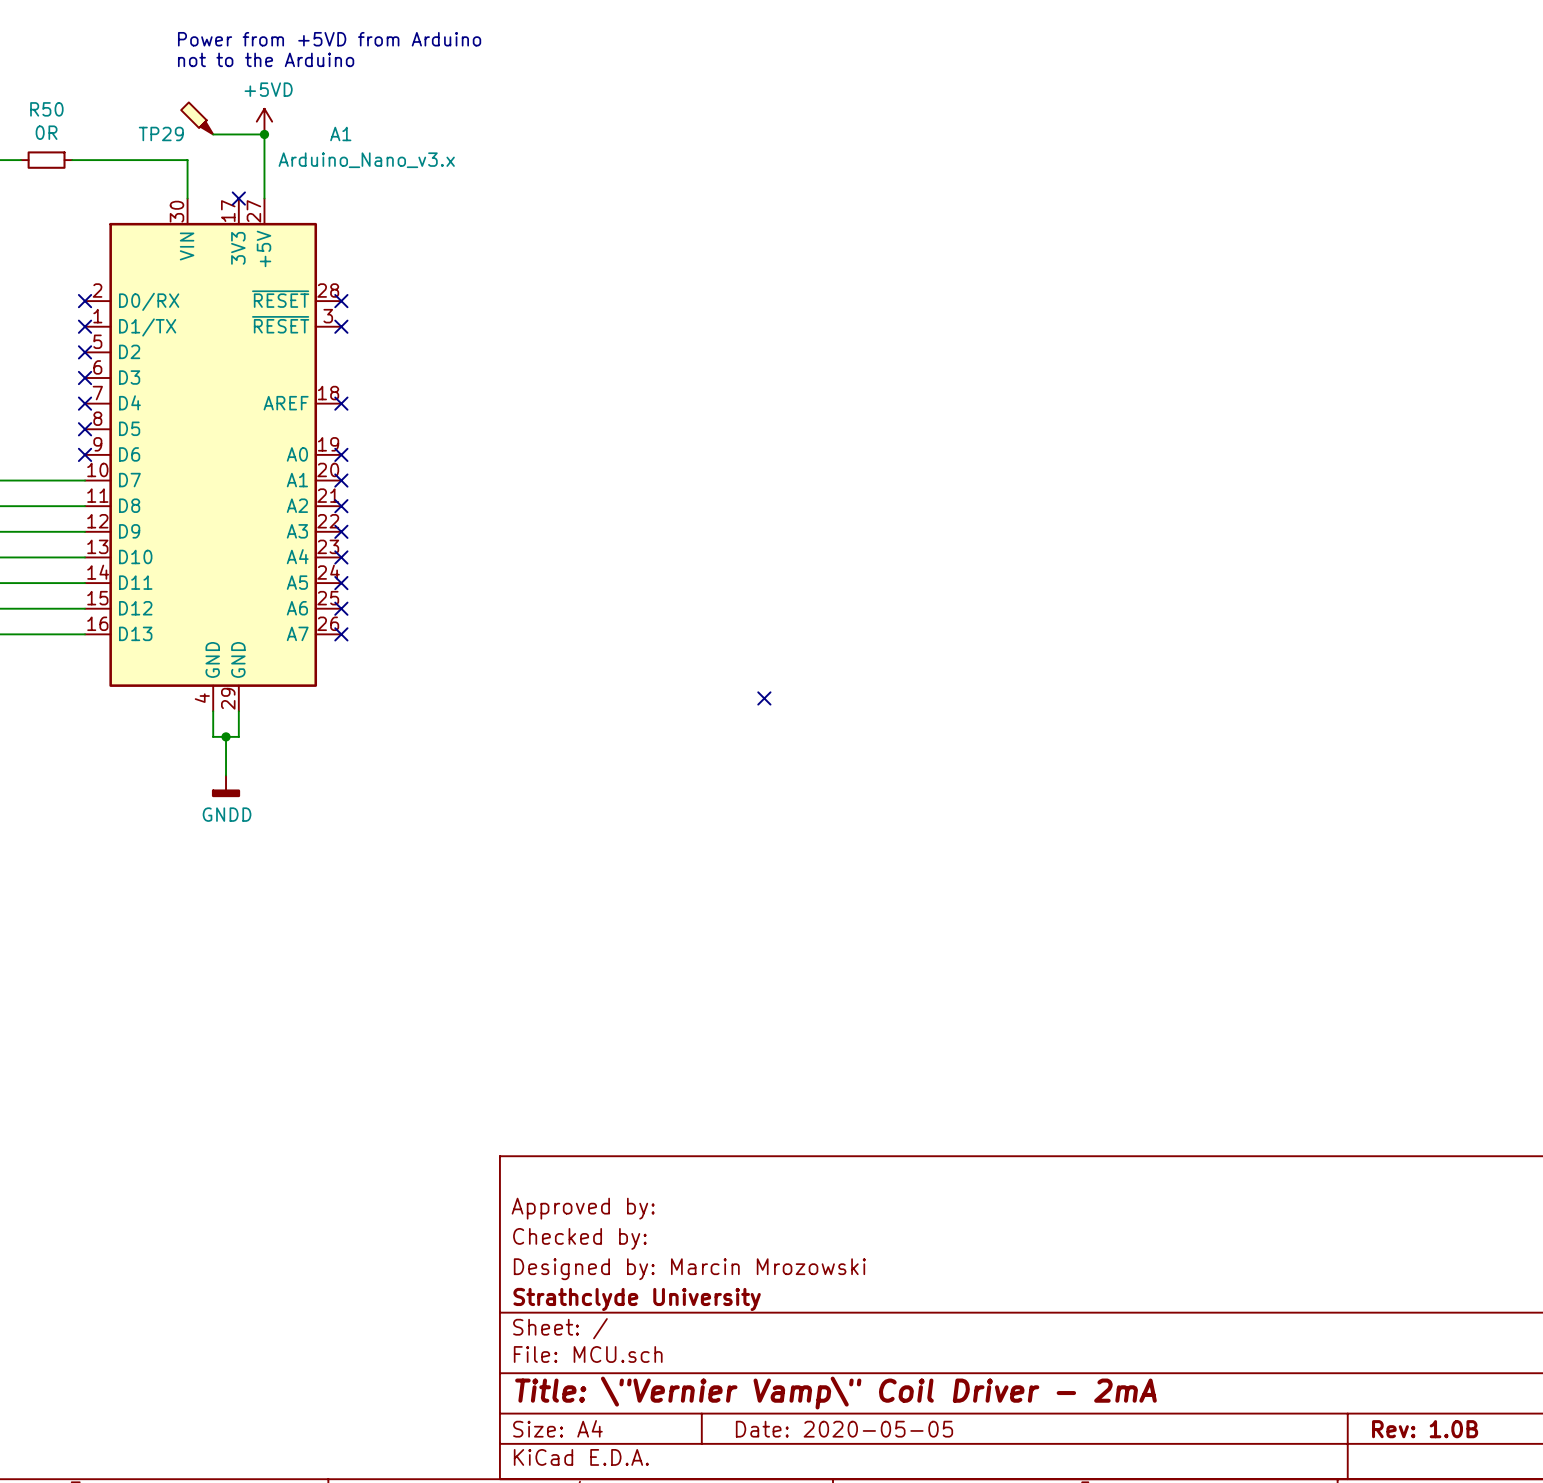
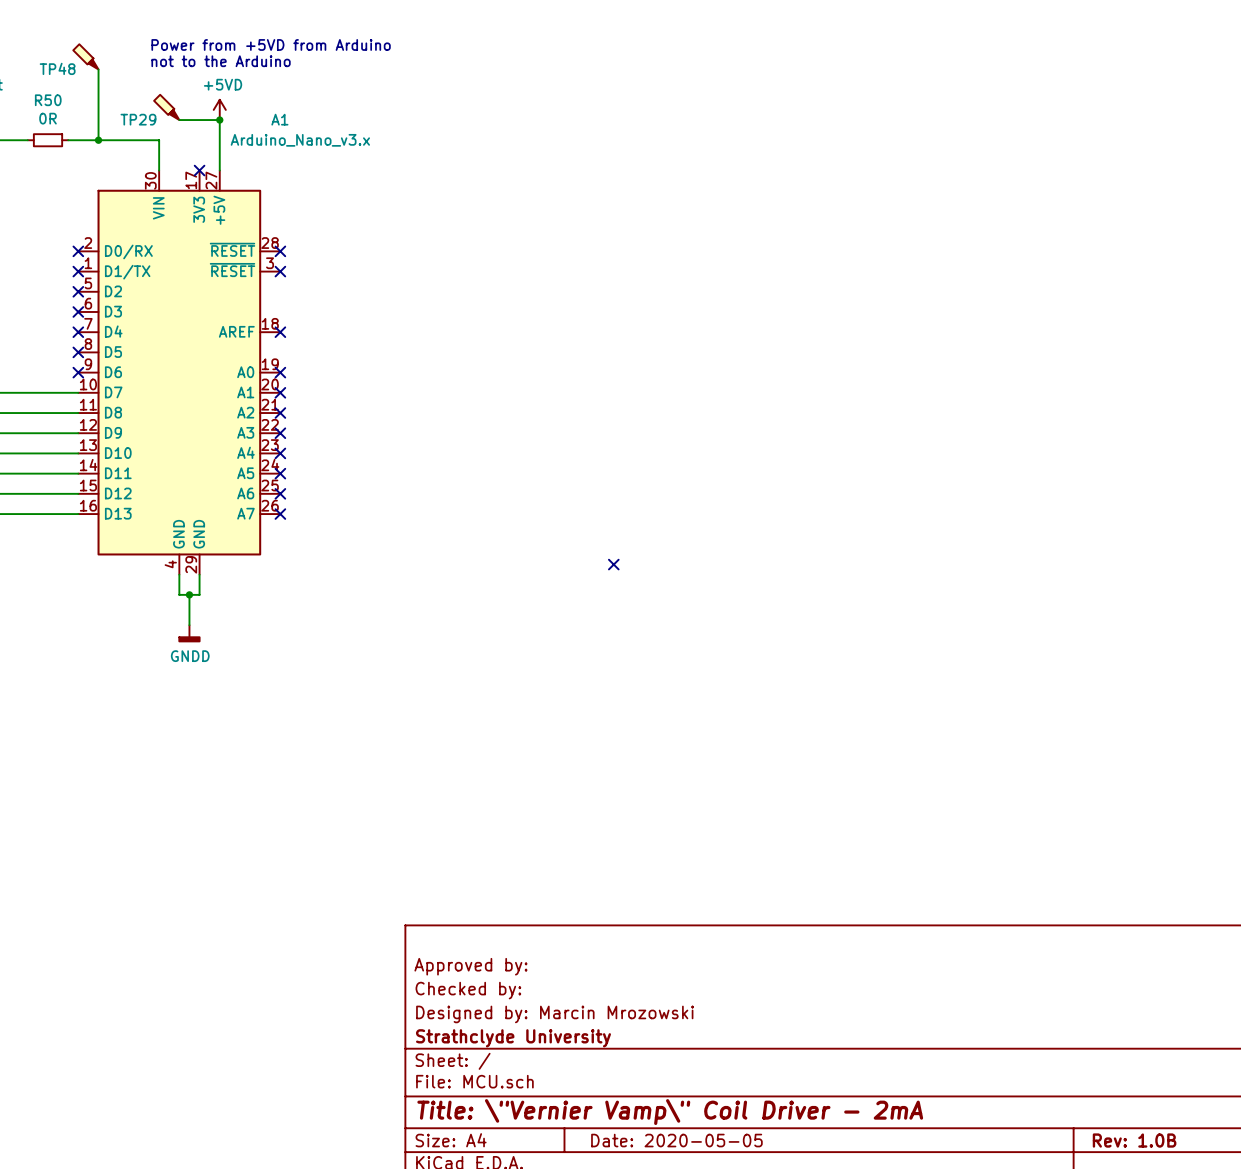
TP48: none -> (85, 56)
wire: none -> (98, 69) (98, 140)
junction: none -> (98, 140)

